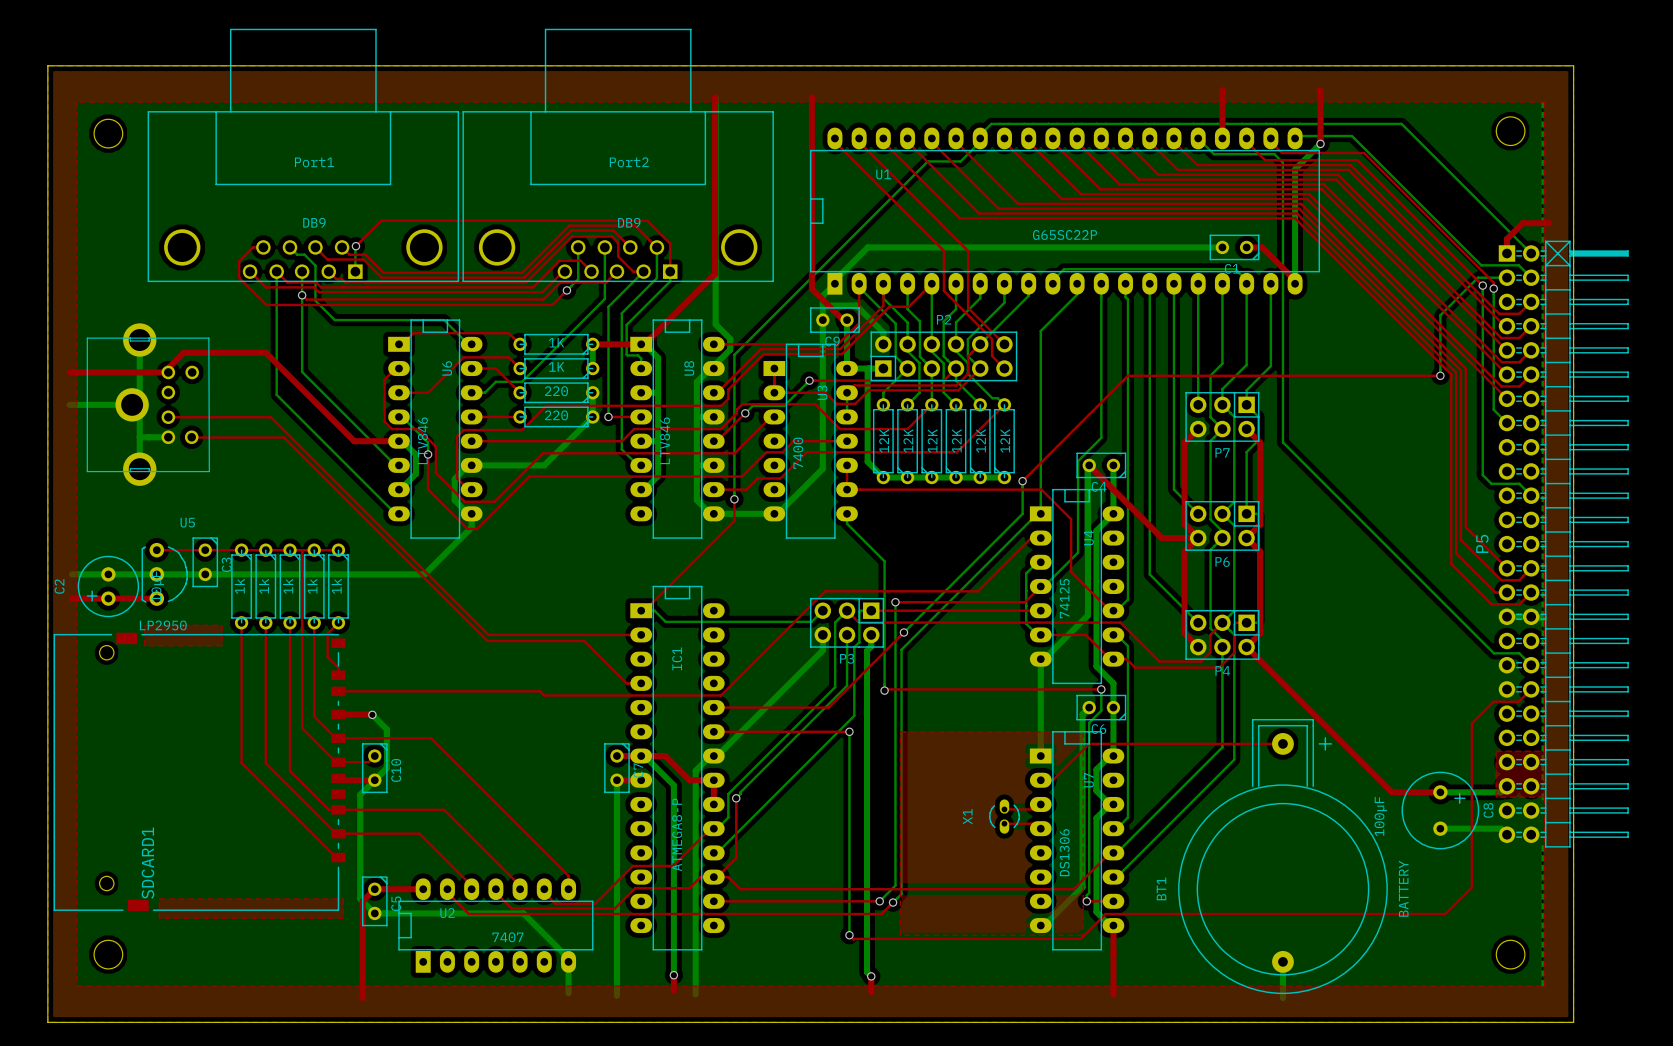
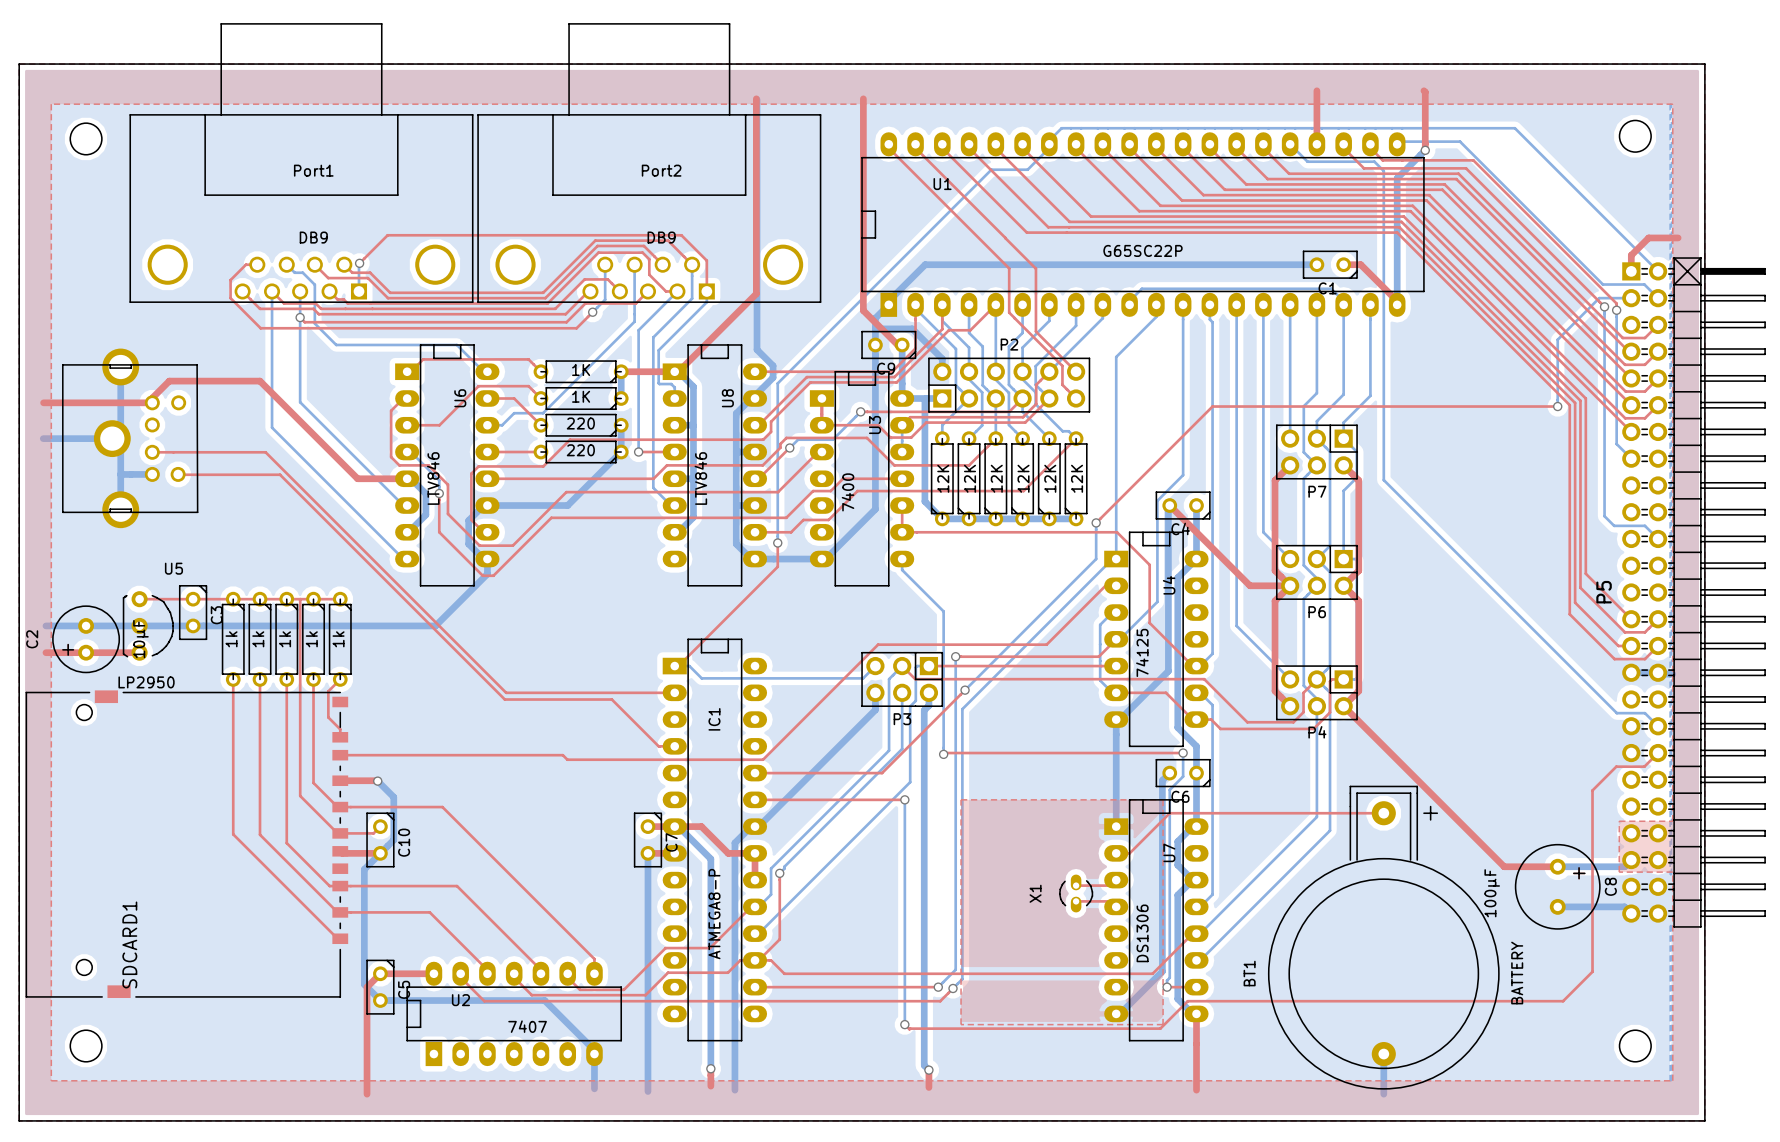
top zone outline: (144, 625) (144, 645) (222, 645) (222, 625) (144, 625) -> none
top zone outline: (159, 898) (343, 898) (343, 918) (159, 918) (159, 898) -> none

